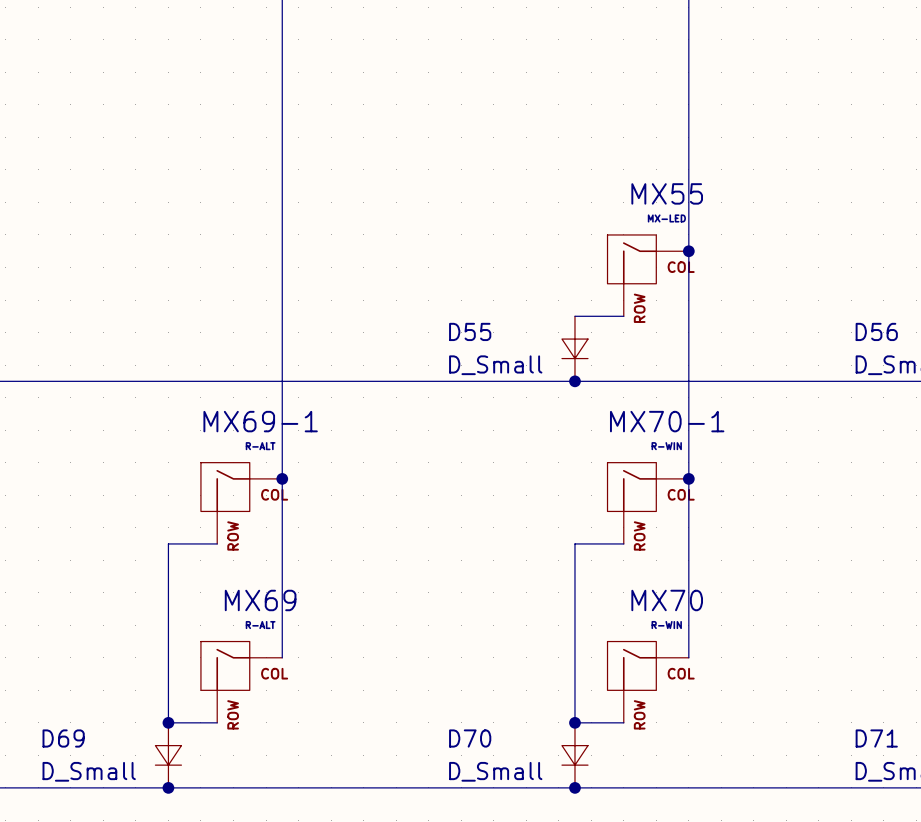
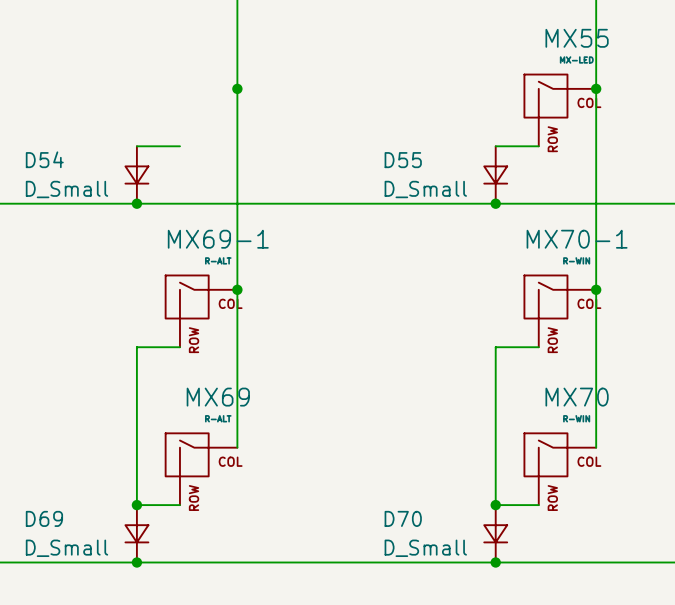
junction: none -> (237, 88)
wire: none -> (136, 146) (179, 146)
D54: none -> D_Small (136, 175)
junction: none -> (136, 203)

